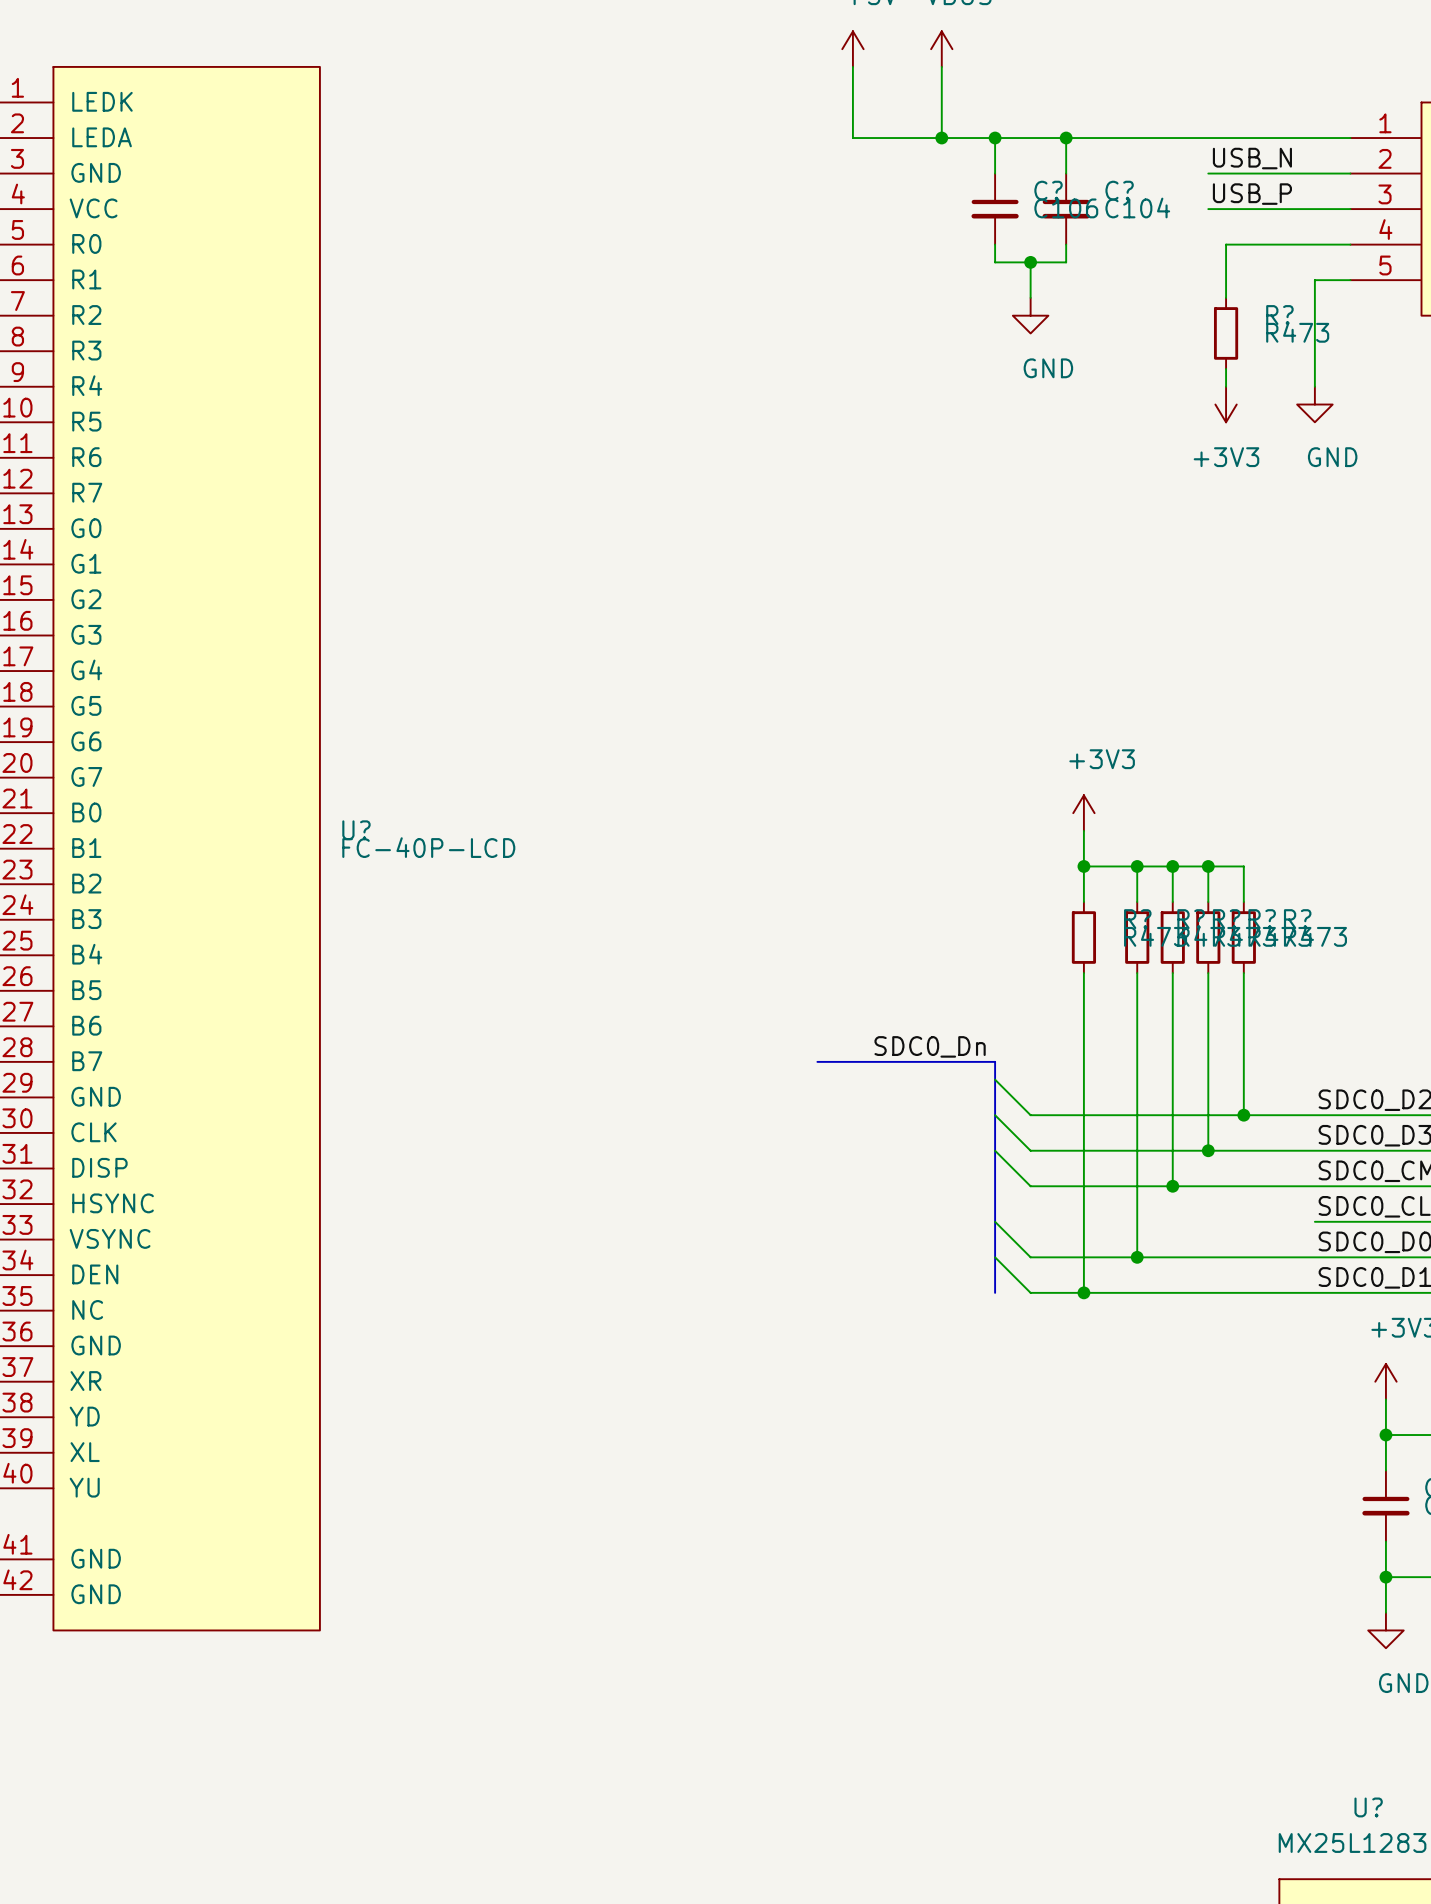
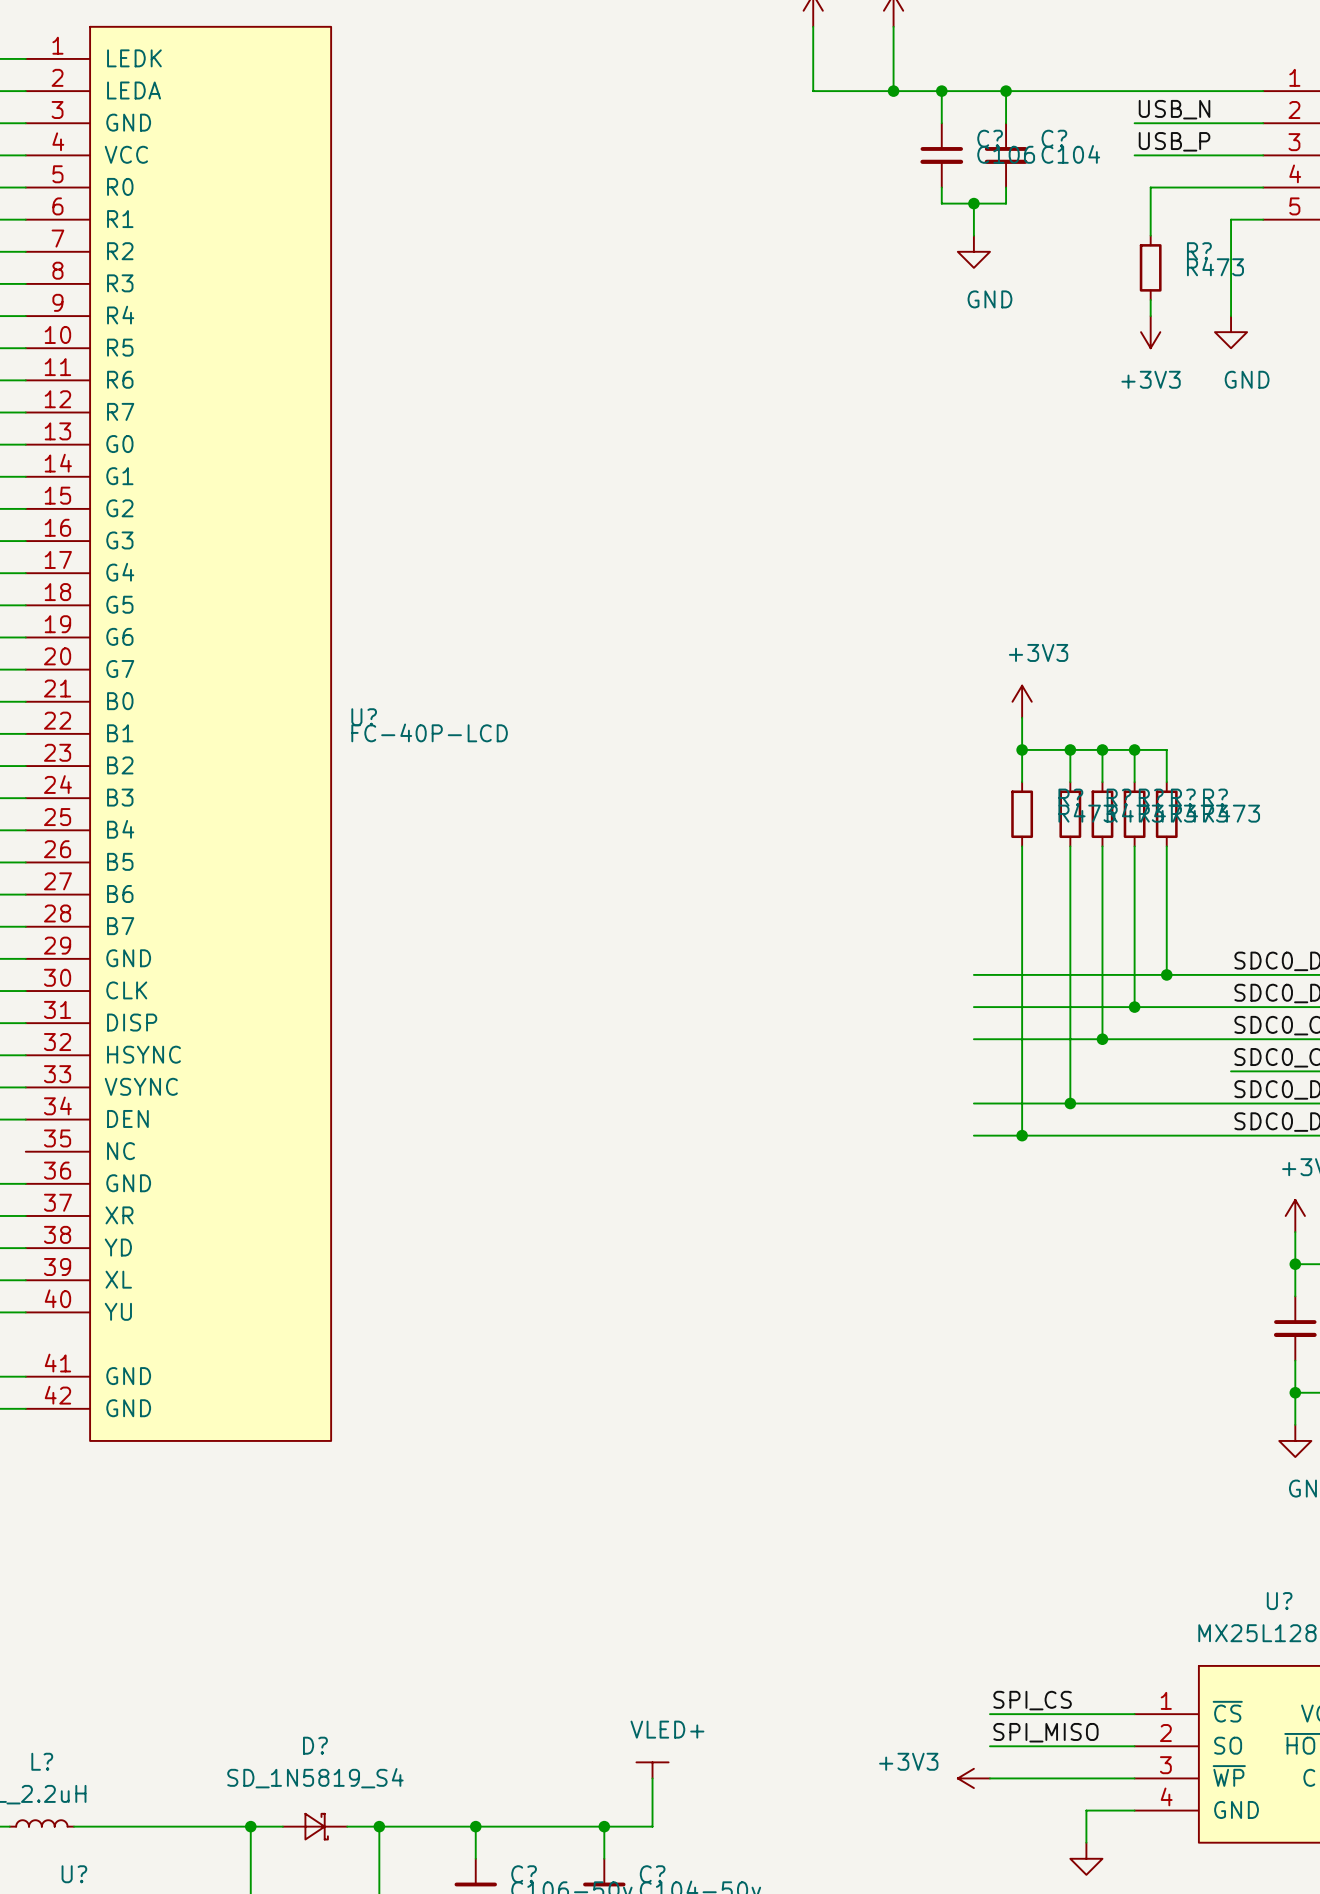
label: SDC0_Dn (930, 1046) -> none
bus: (817, 1061) (995, 1061) (995, 1292) -> none
wire: (995, 1079) (1030, 1115) -> none
wire: (995, 1115) (1030, 1150) -> none
wire: (995, 1150) (1030, 1186) -> none
wire: (995, 1221) (1030, 1257) -> none
wire: (995, 1257) (1030, 1292) -> none

